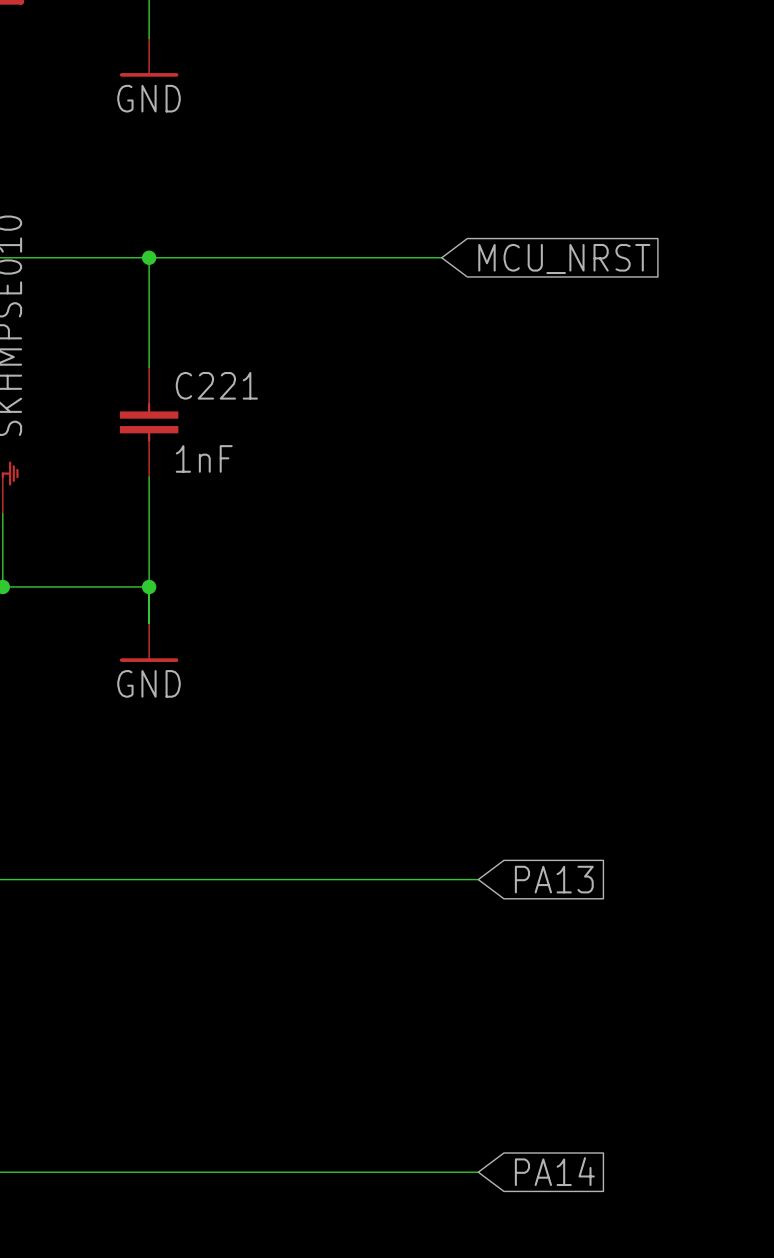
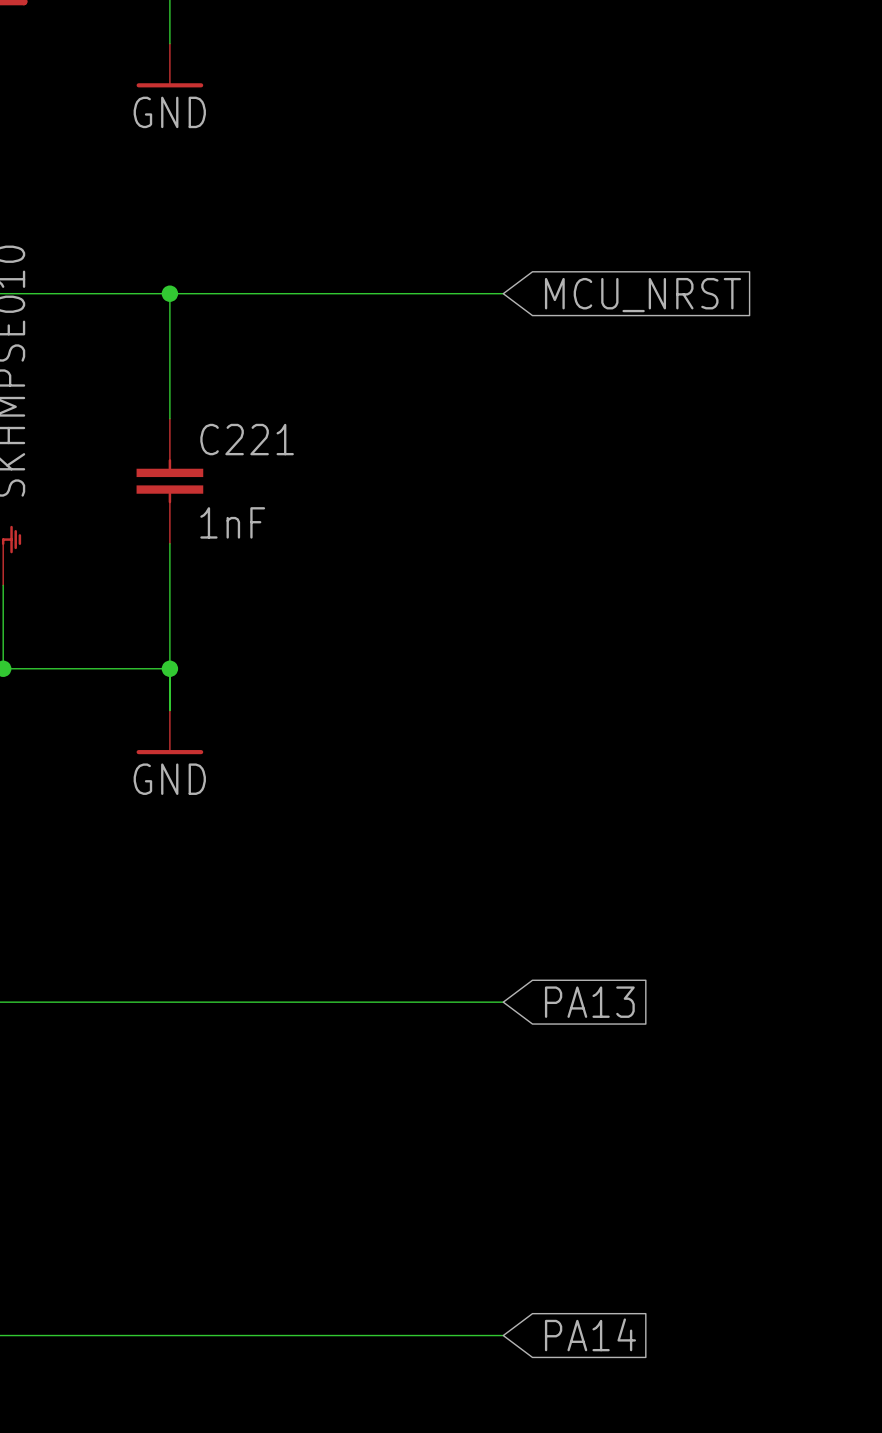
wire: (441, 879) (478, 879) -> none
global label position: PA13 (554, 879) -> PA13 (589, 1002)
global label position: PA14 (554, 1171) -> PA14 (590, 1334)
wire: (441, 1172) (478, 1172) -> none

